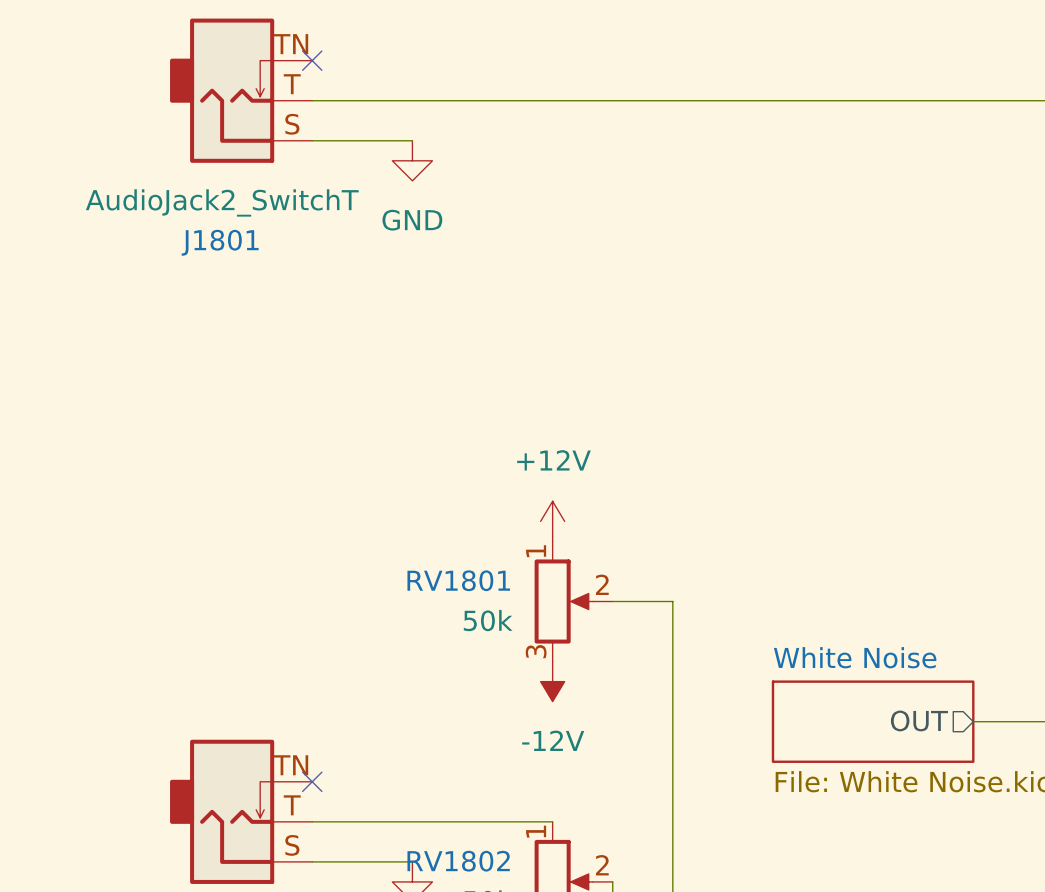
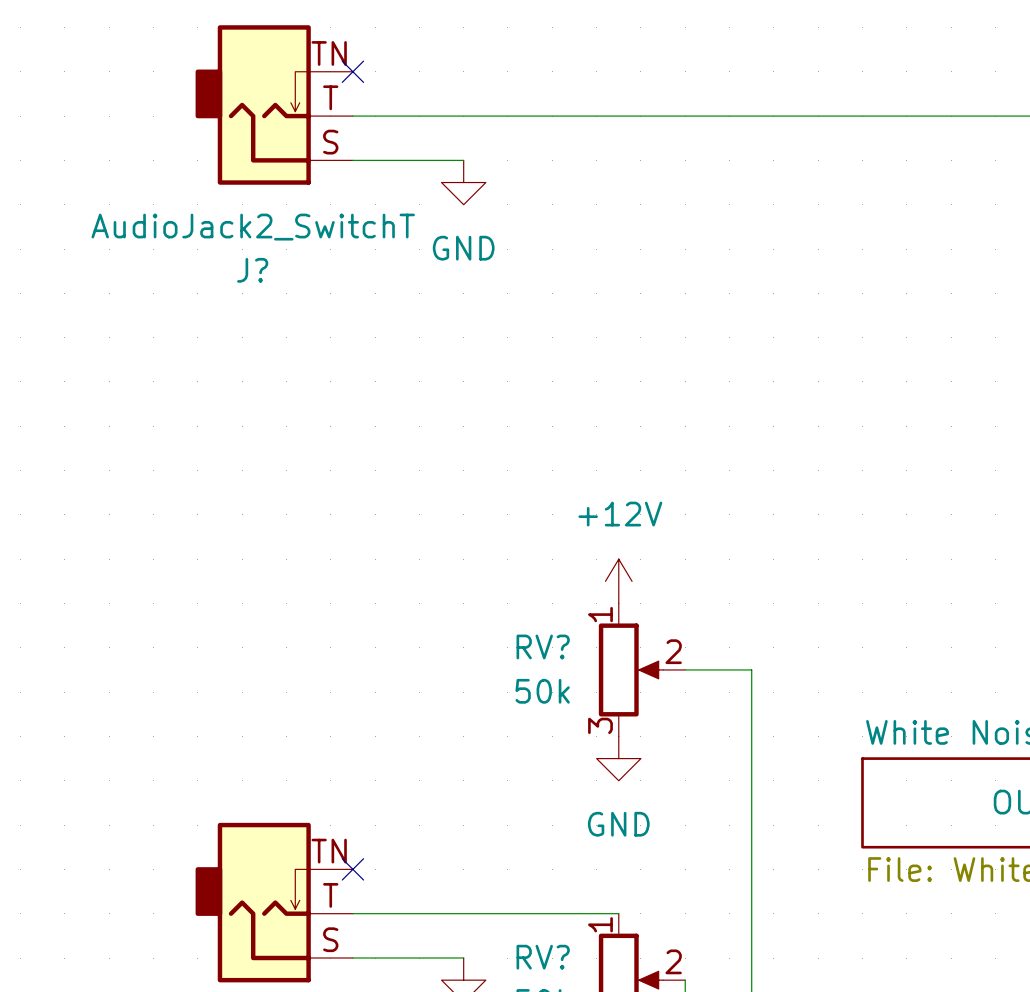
J1801 name: J1801 (220, 242) -> J? (252, 270)
RV1801 name: RV1801 (458, 580) -> RV? (543, 646)
power symbol: -12V (552, 681) -> GND (618, 758)
RV1802 name: RV1802 (458, 861) -> RV? (543, 957)

